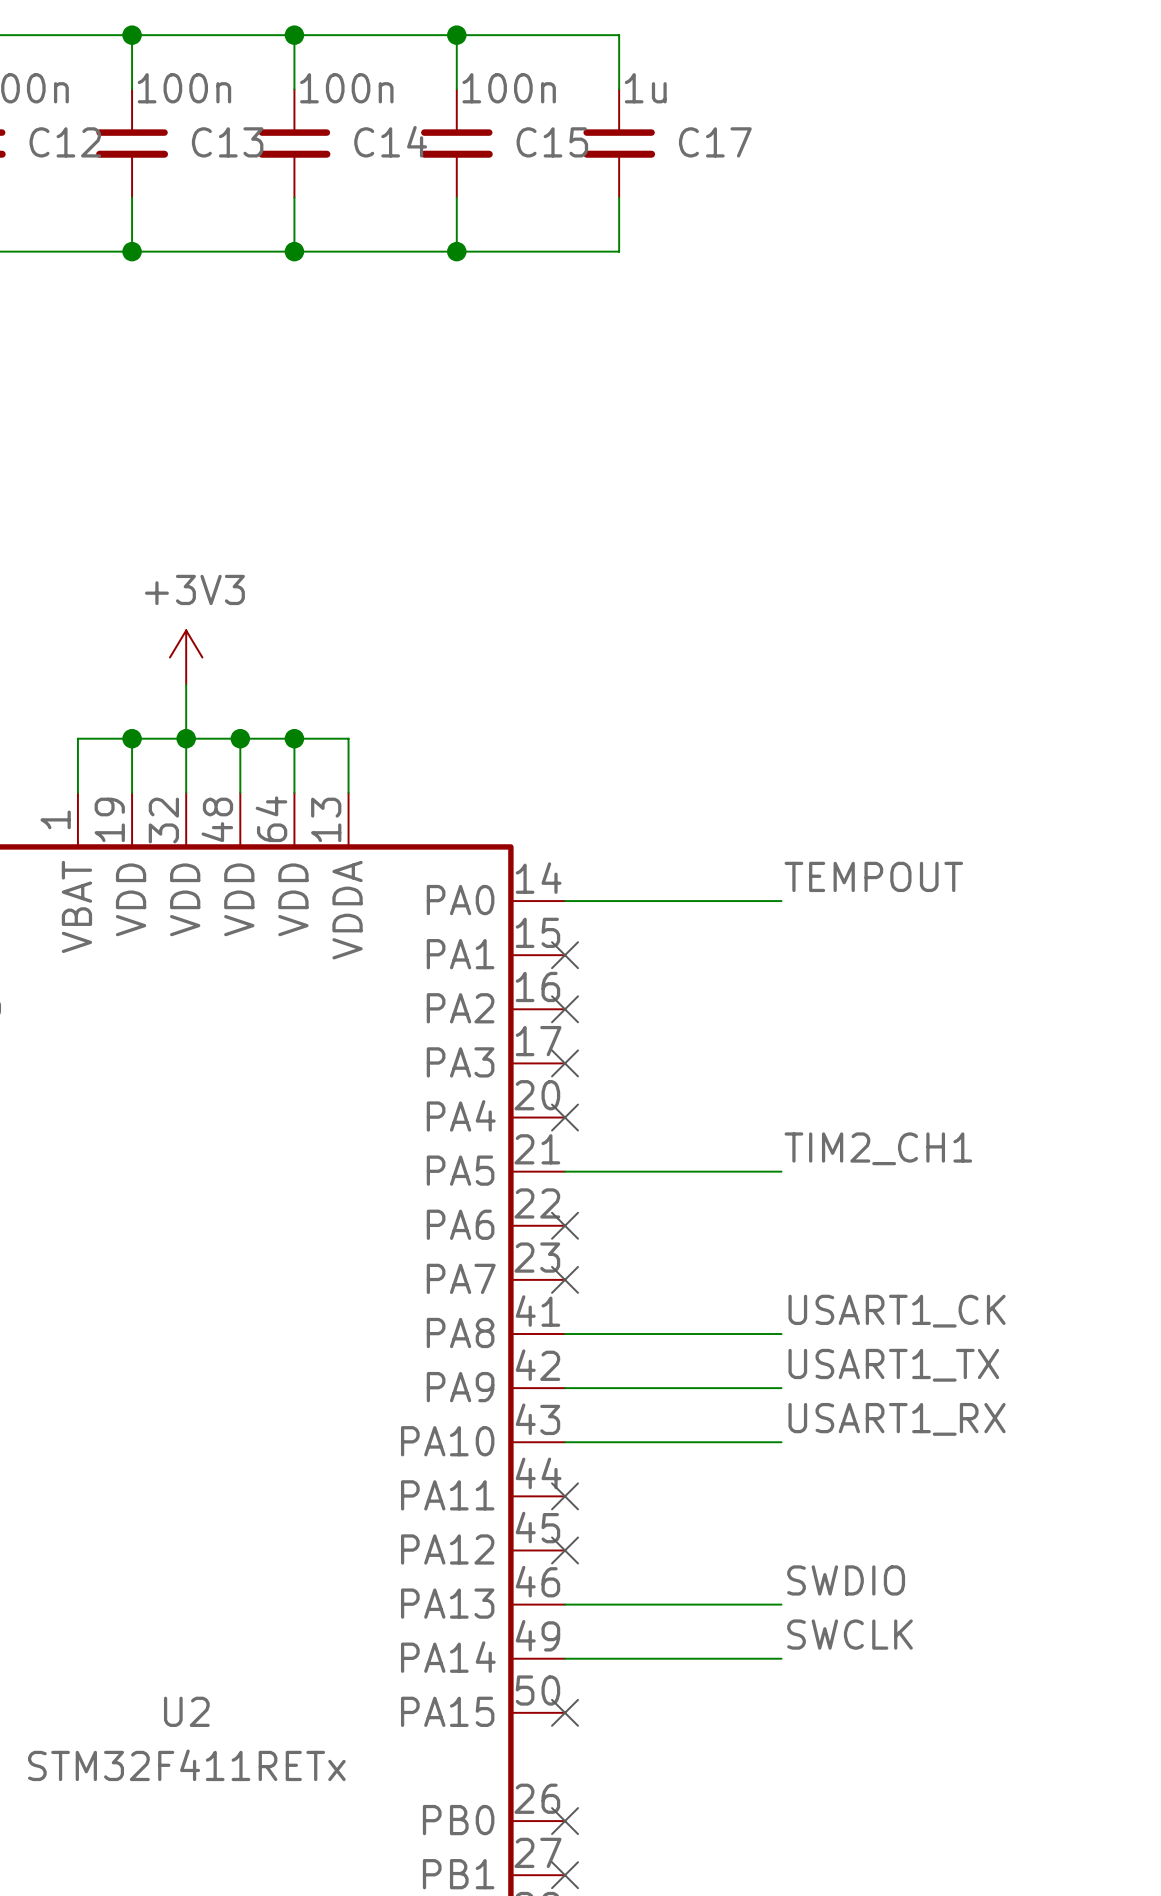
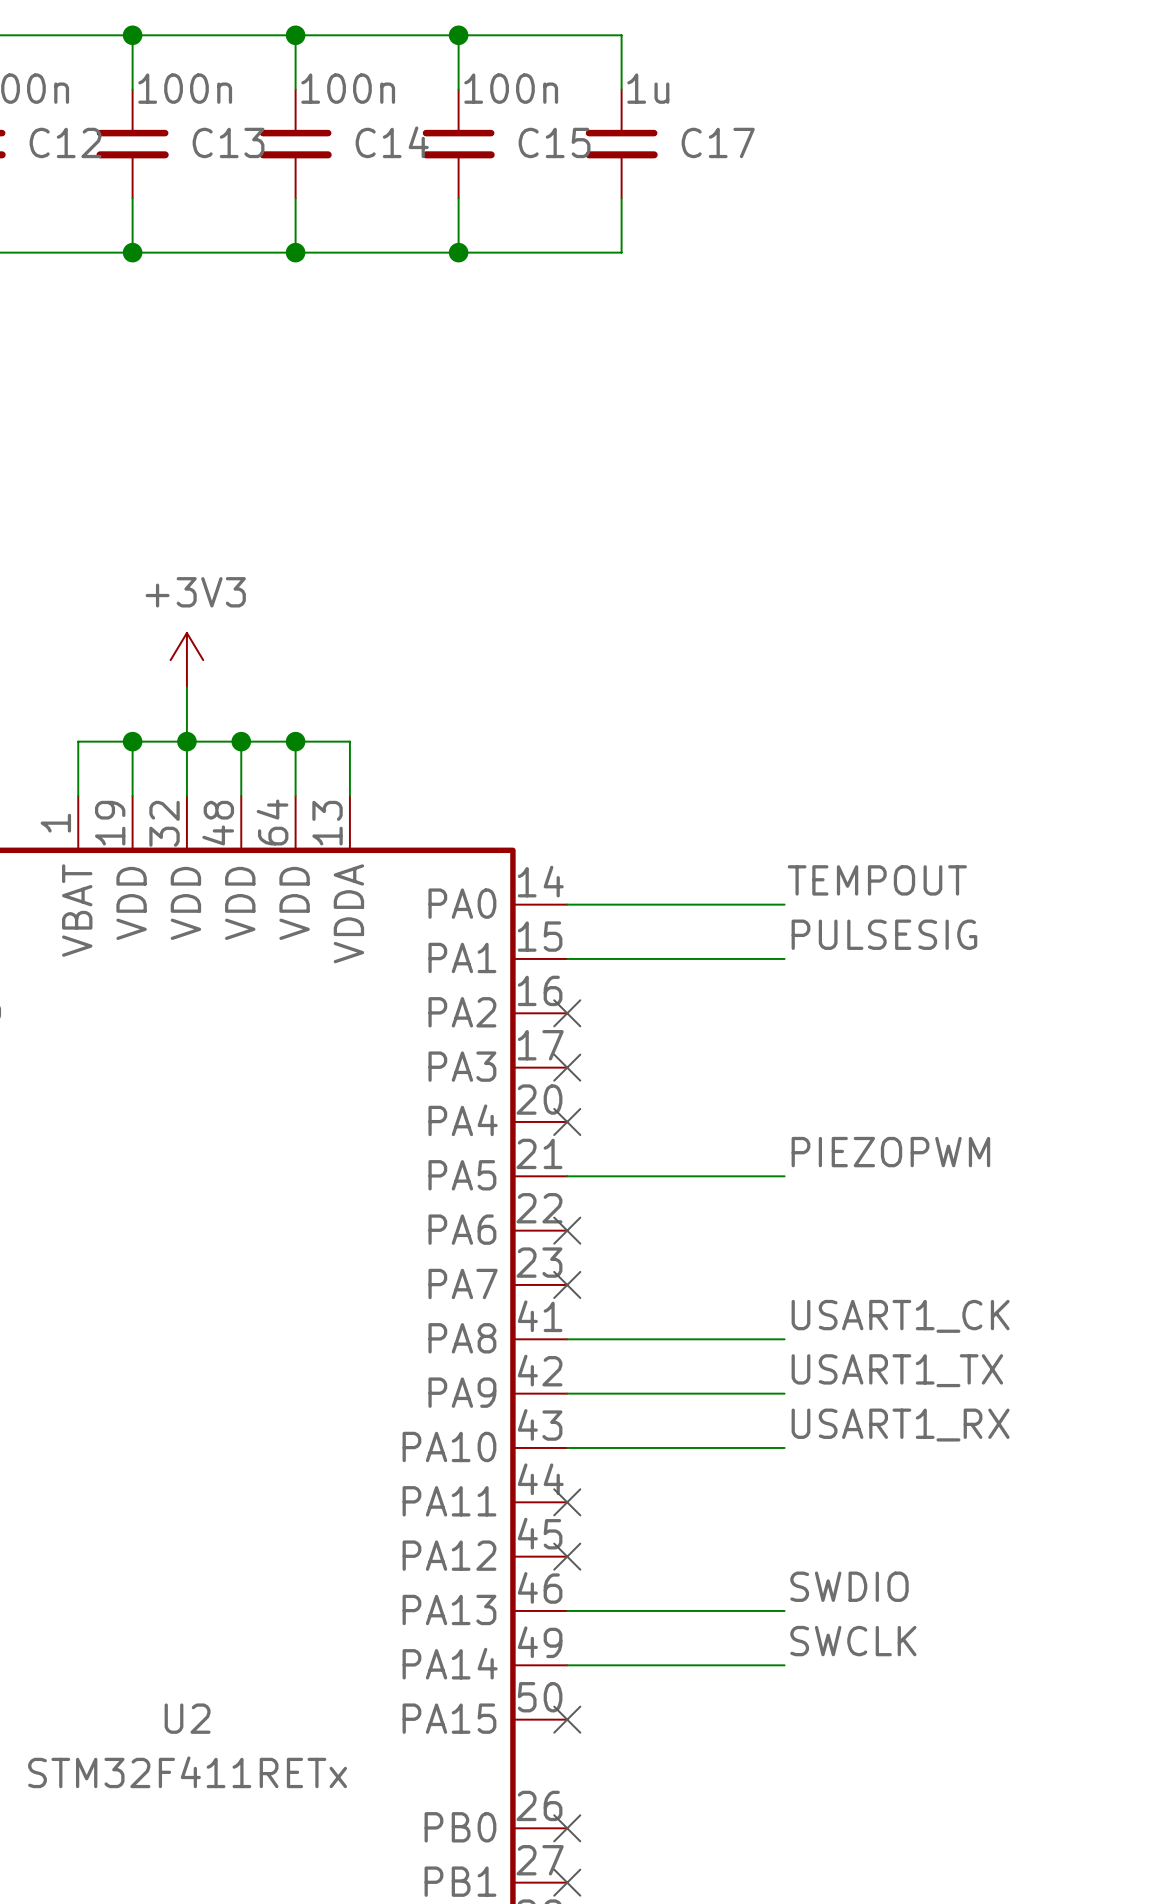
label: none -> PULSESIG (884, 934)
wire: none -> (567, 958) (784, 958)
no-connect mark: (565, 955) -> none
label: TIM2_CH1 (878, 1148) -> PIEZOPWM (890, 1152)

